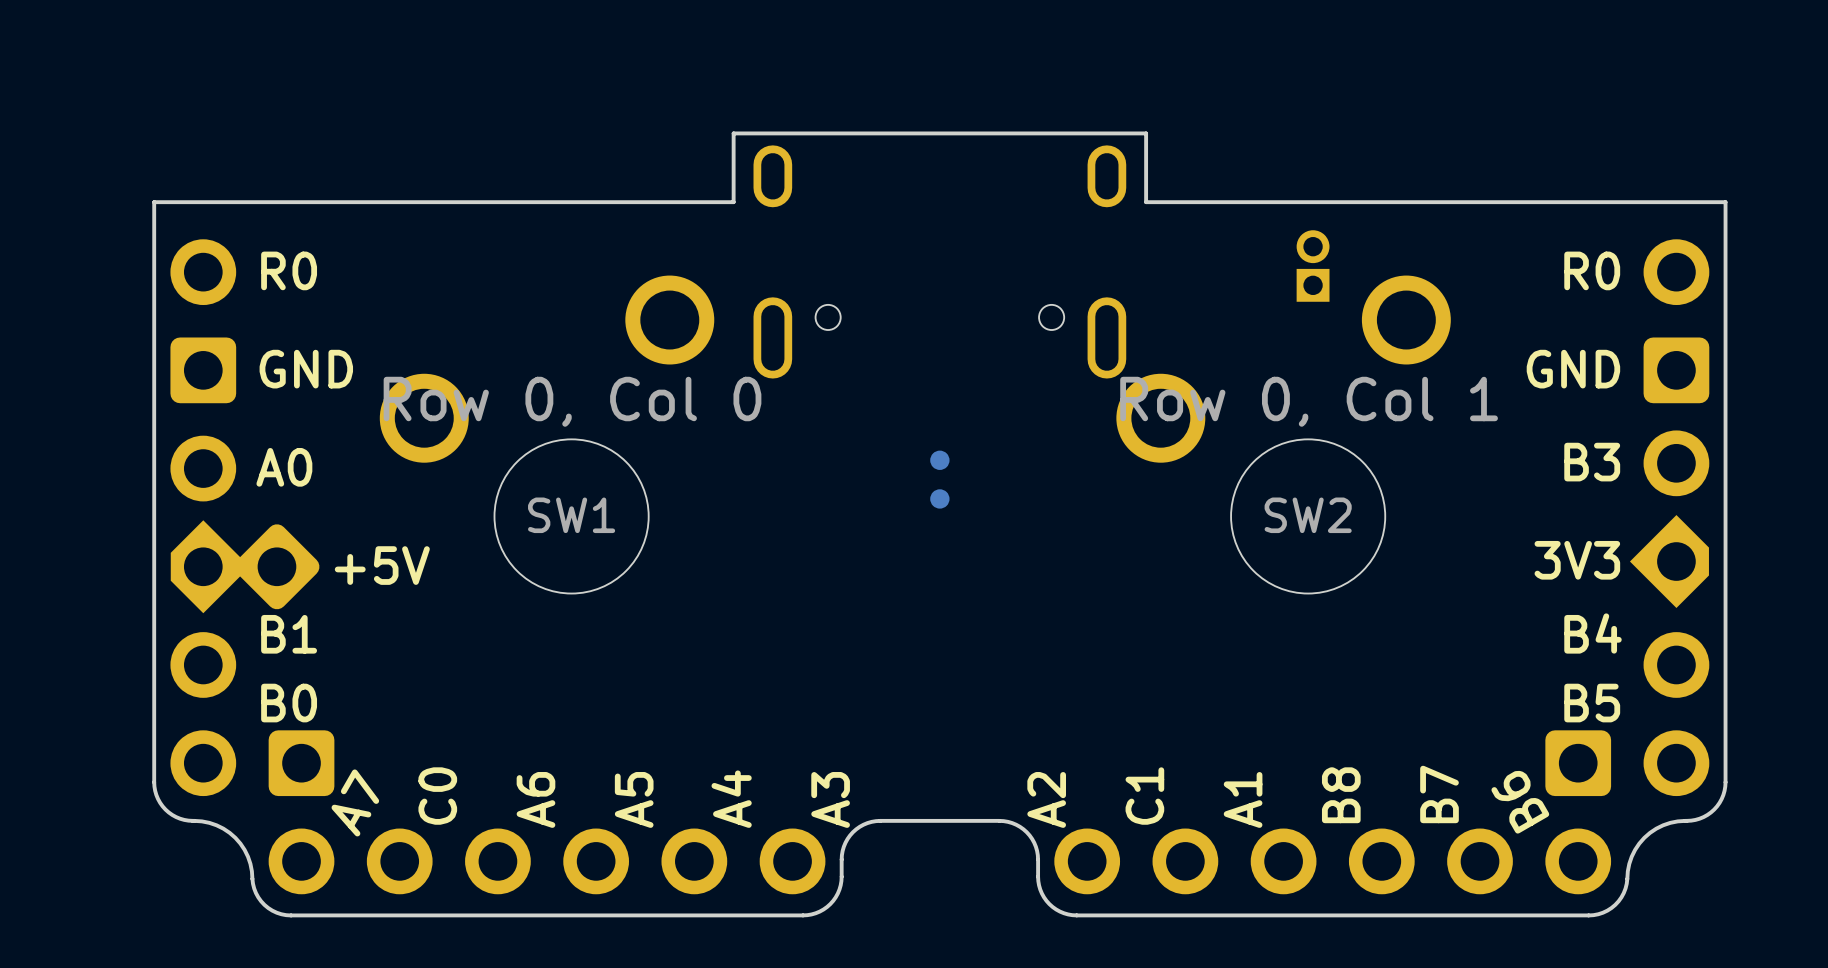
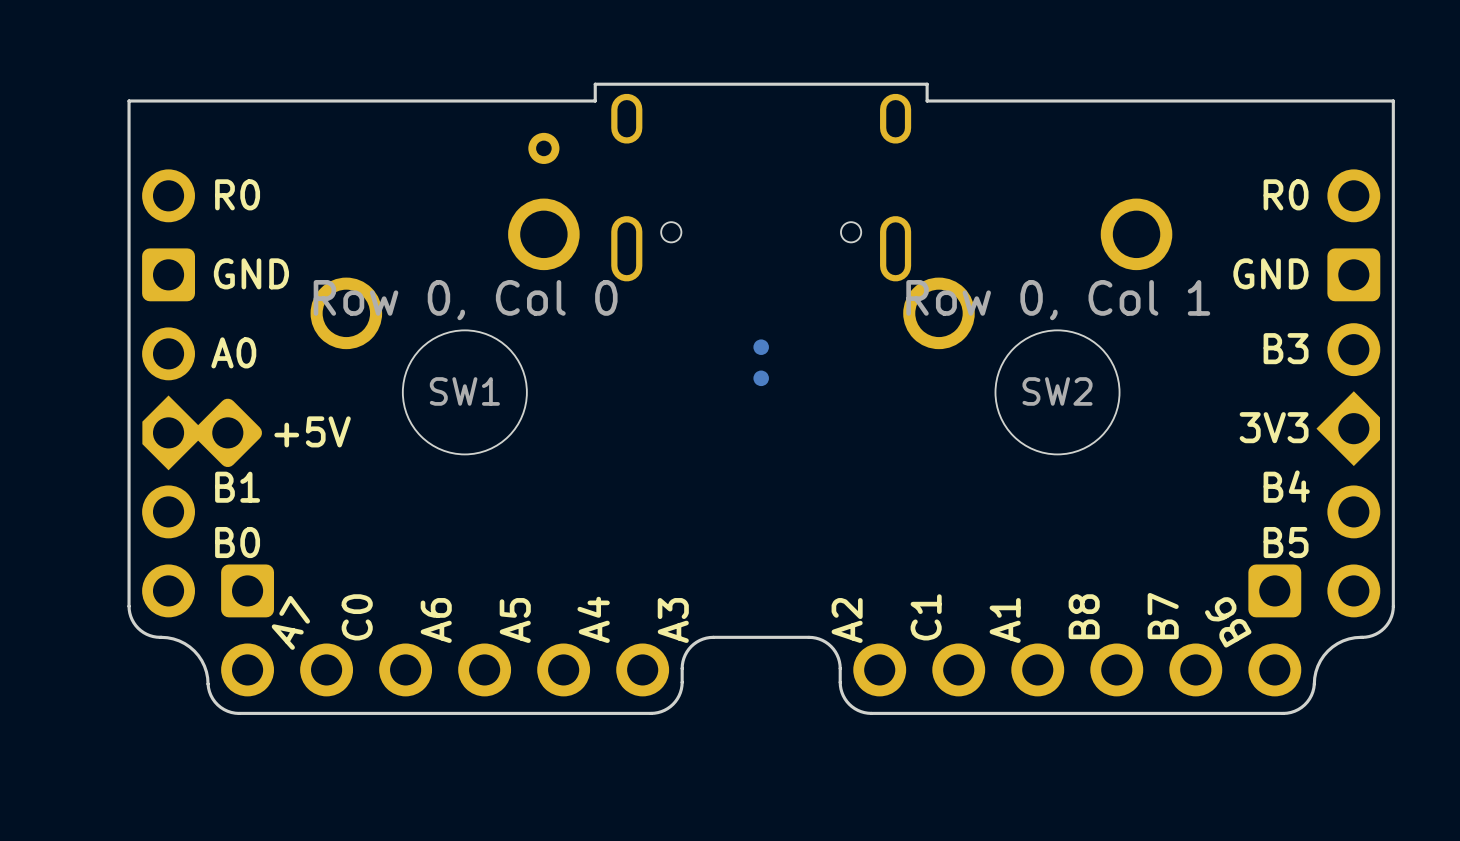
board edge: (733, 154) (733, 202) (154, 202) -> (595, 101) (129, 101) (129, 139)
board edge: (1146, 154) (1146, 202) (1725, 202) -> (927, 101) (1393, 101) (1393, 139)
part: none -> (543, 148)
part: (1313, 266) -> none

